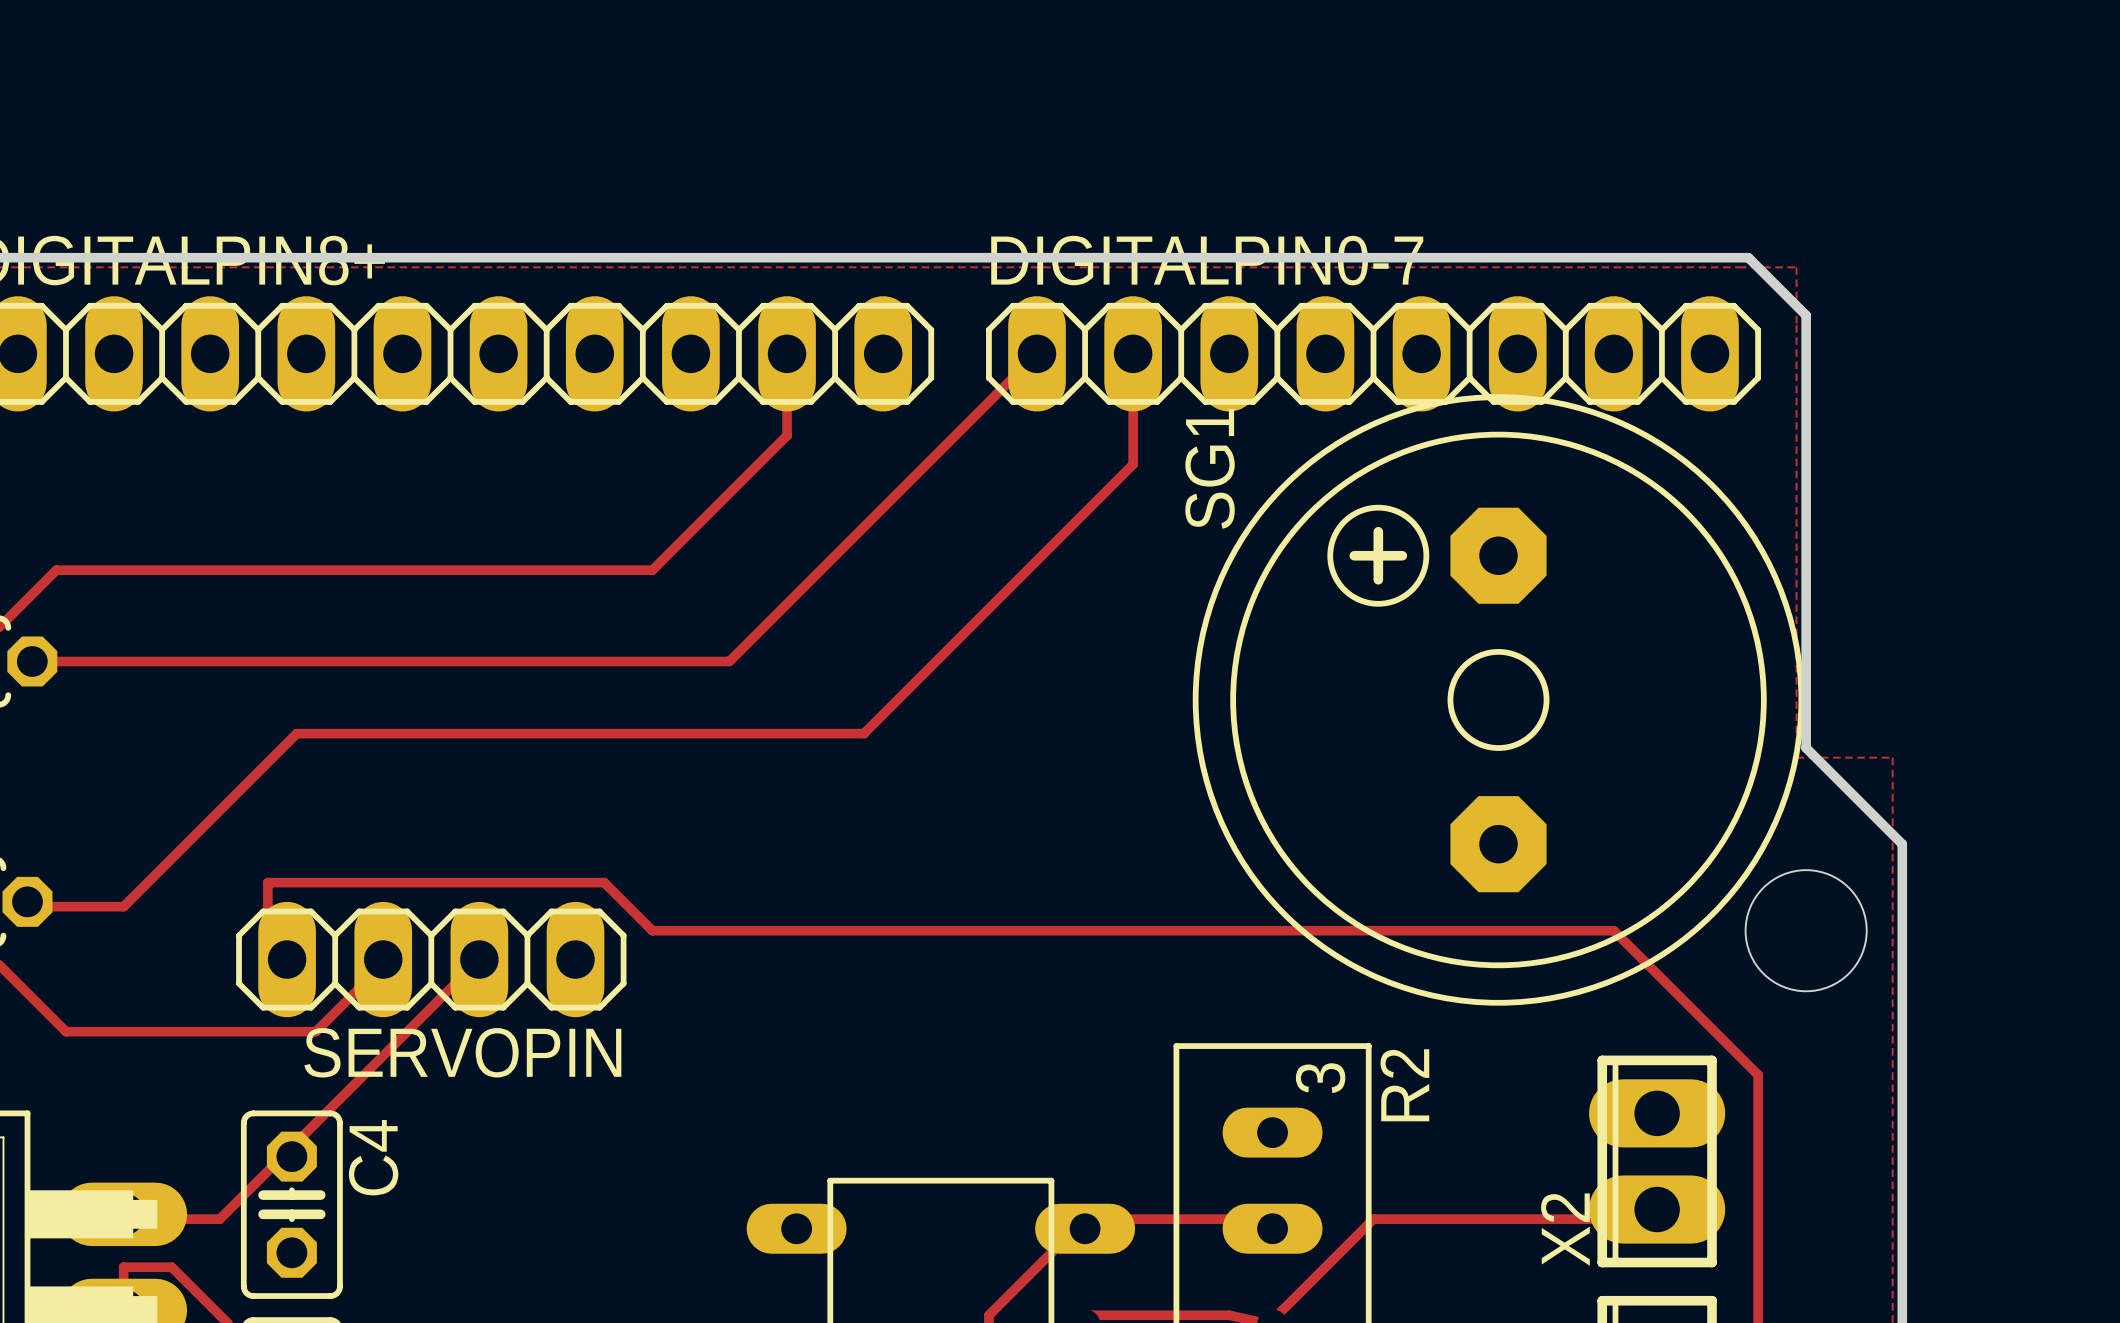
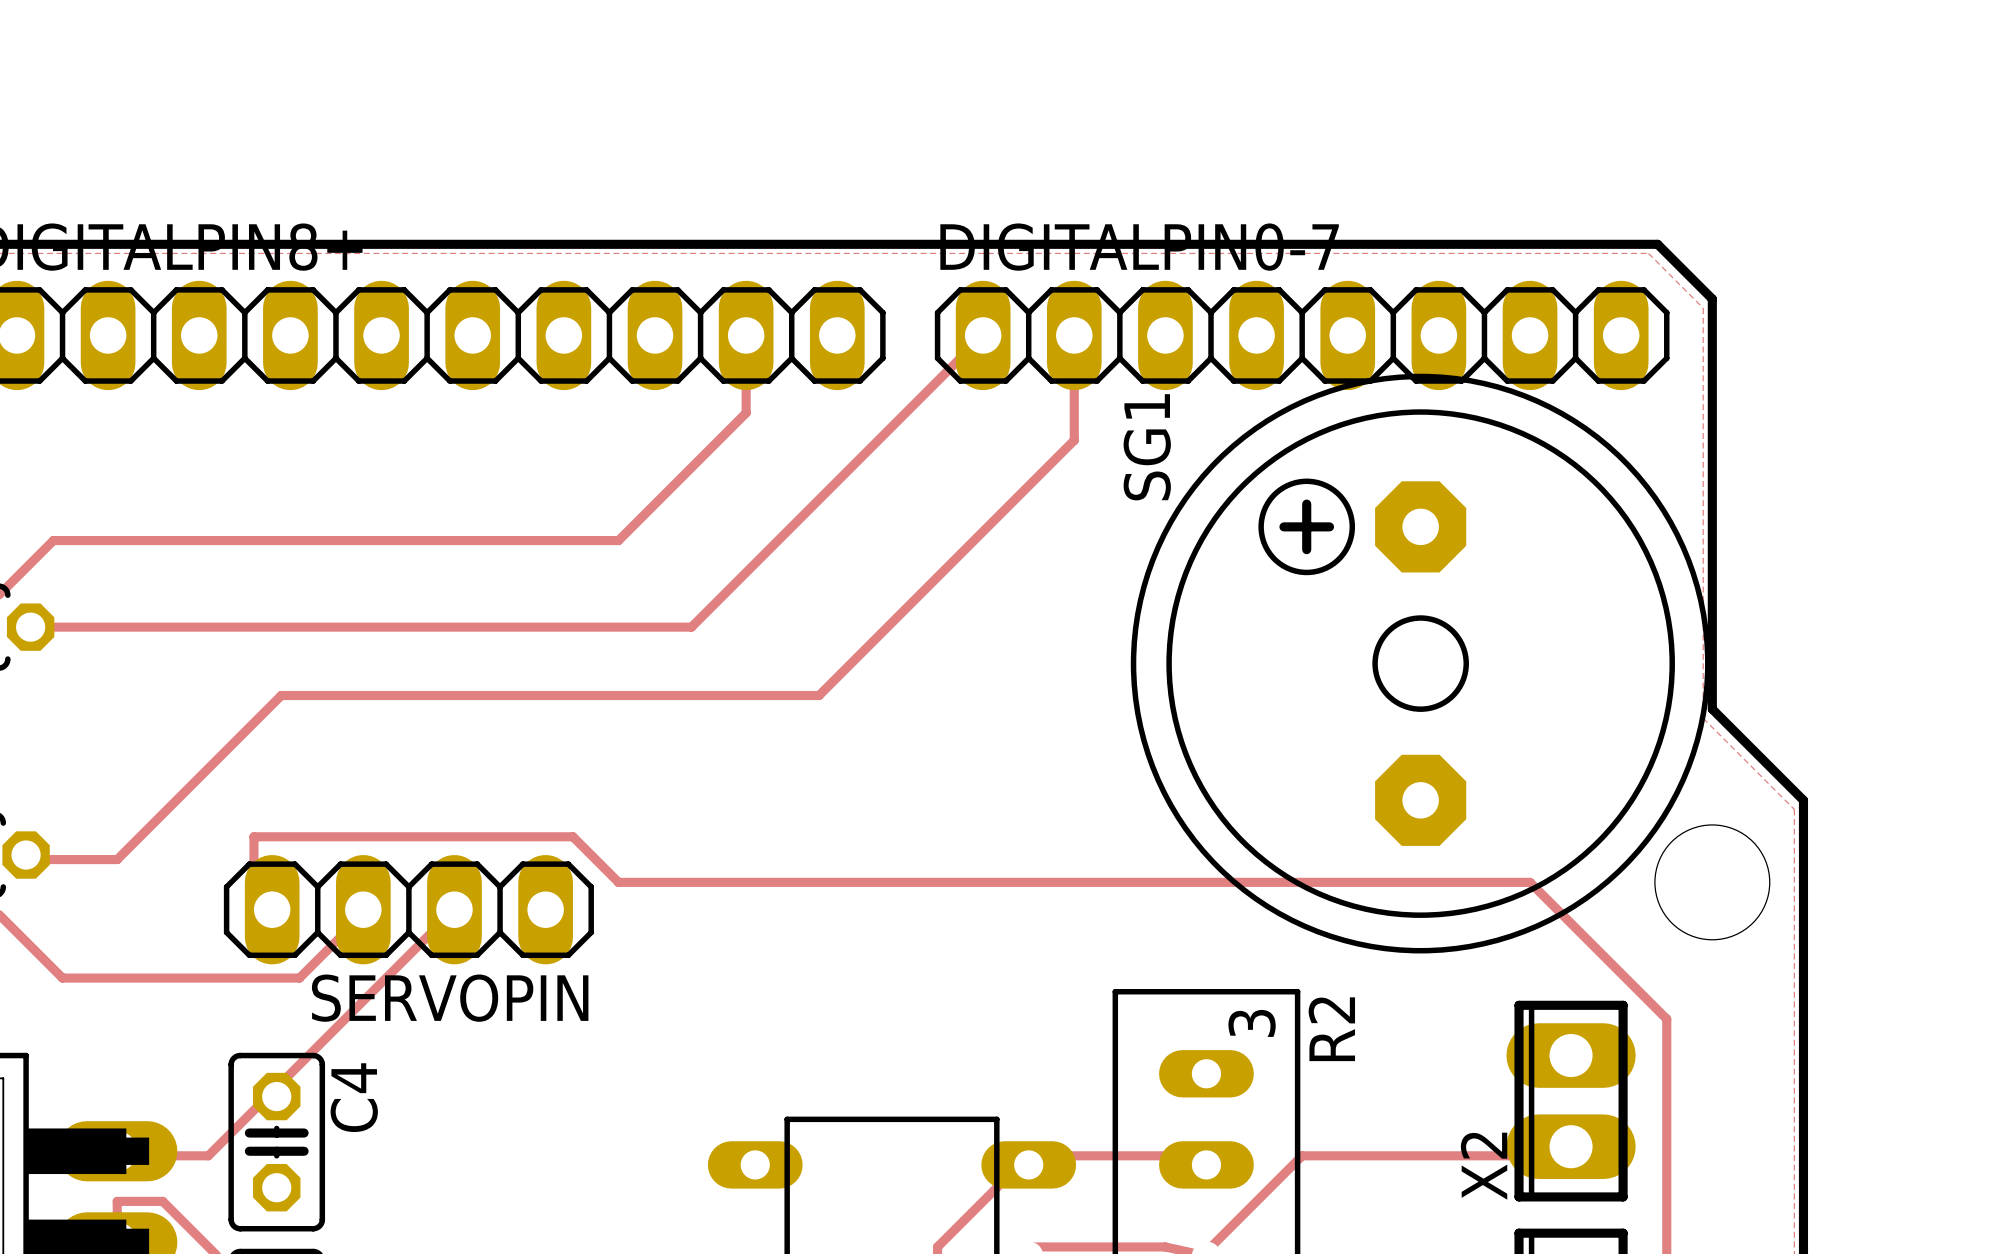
zone outline: (1738, 267) (1796, 267) (1796, 325) -> (1648, 253) (1703, 308)
zone outline: (1796, 757) (1892, 757) (1892, 853) -> (1703, 718) (1794, 809)

